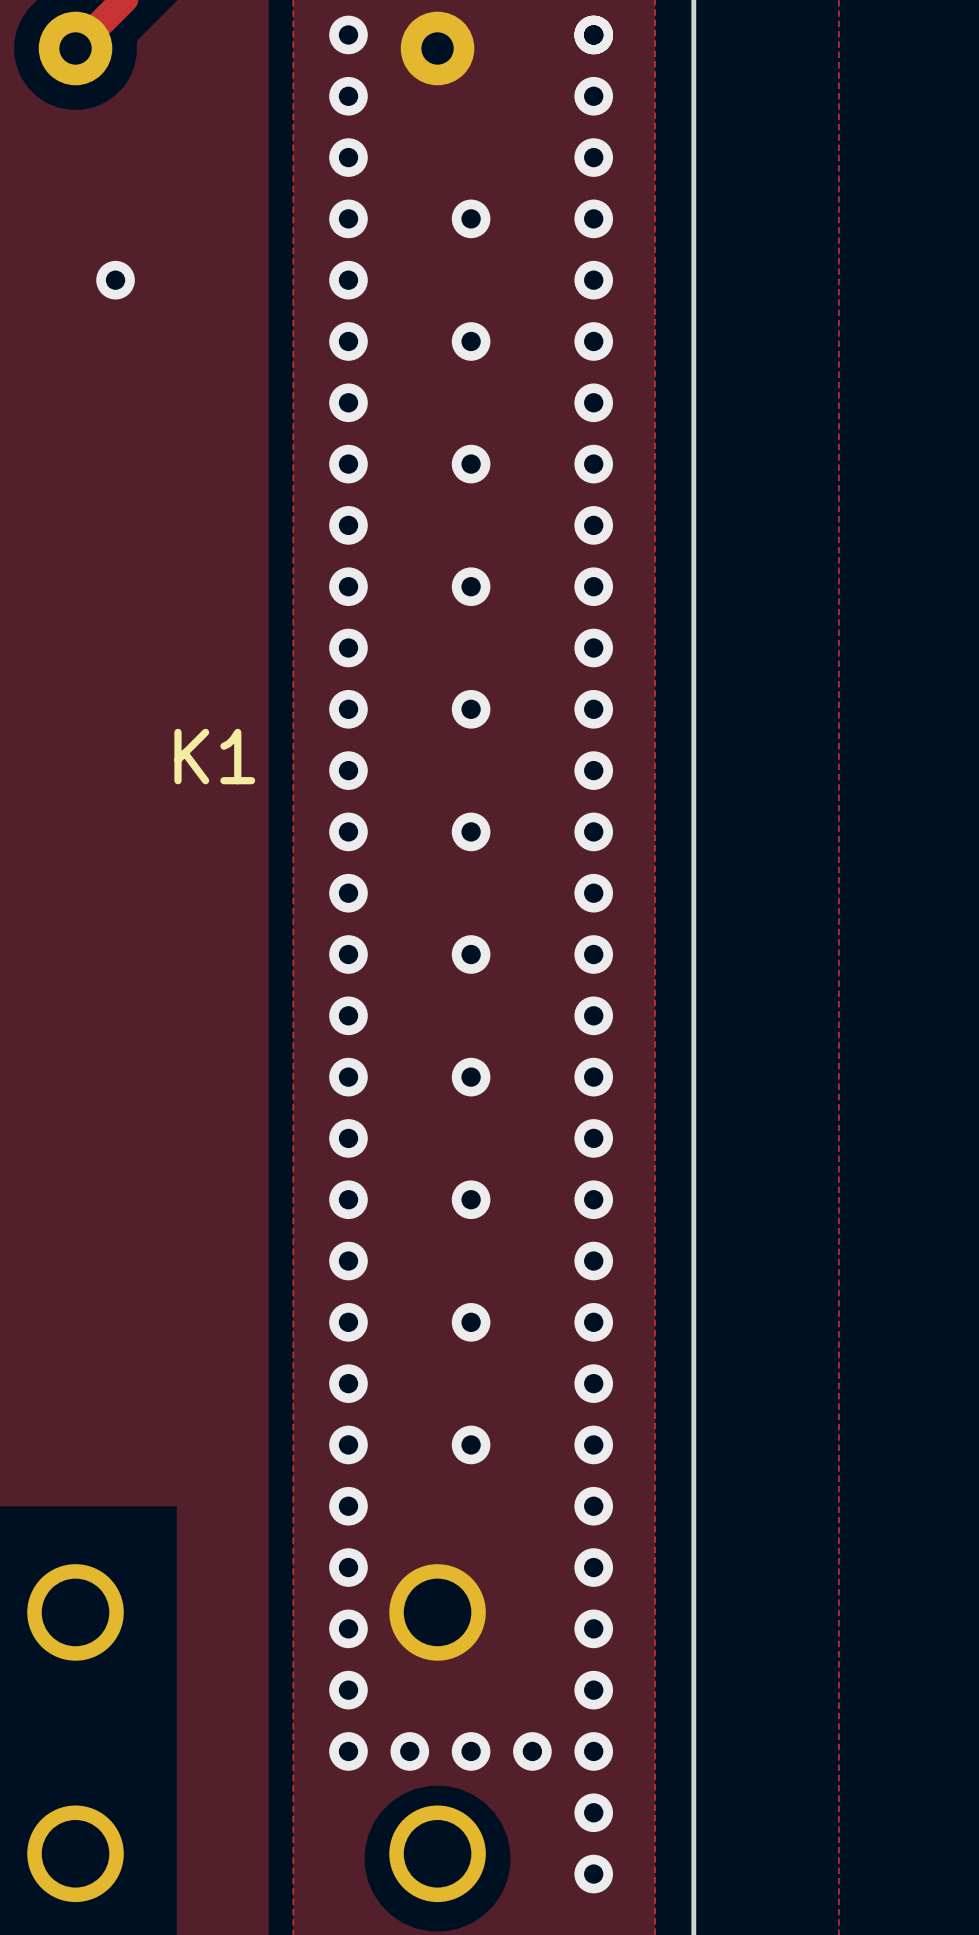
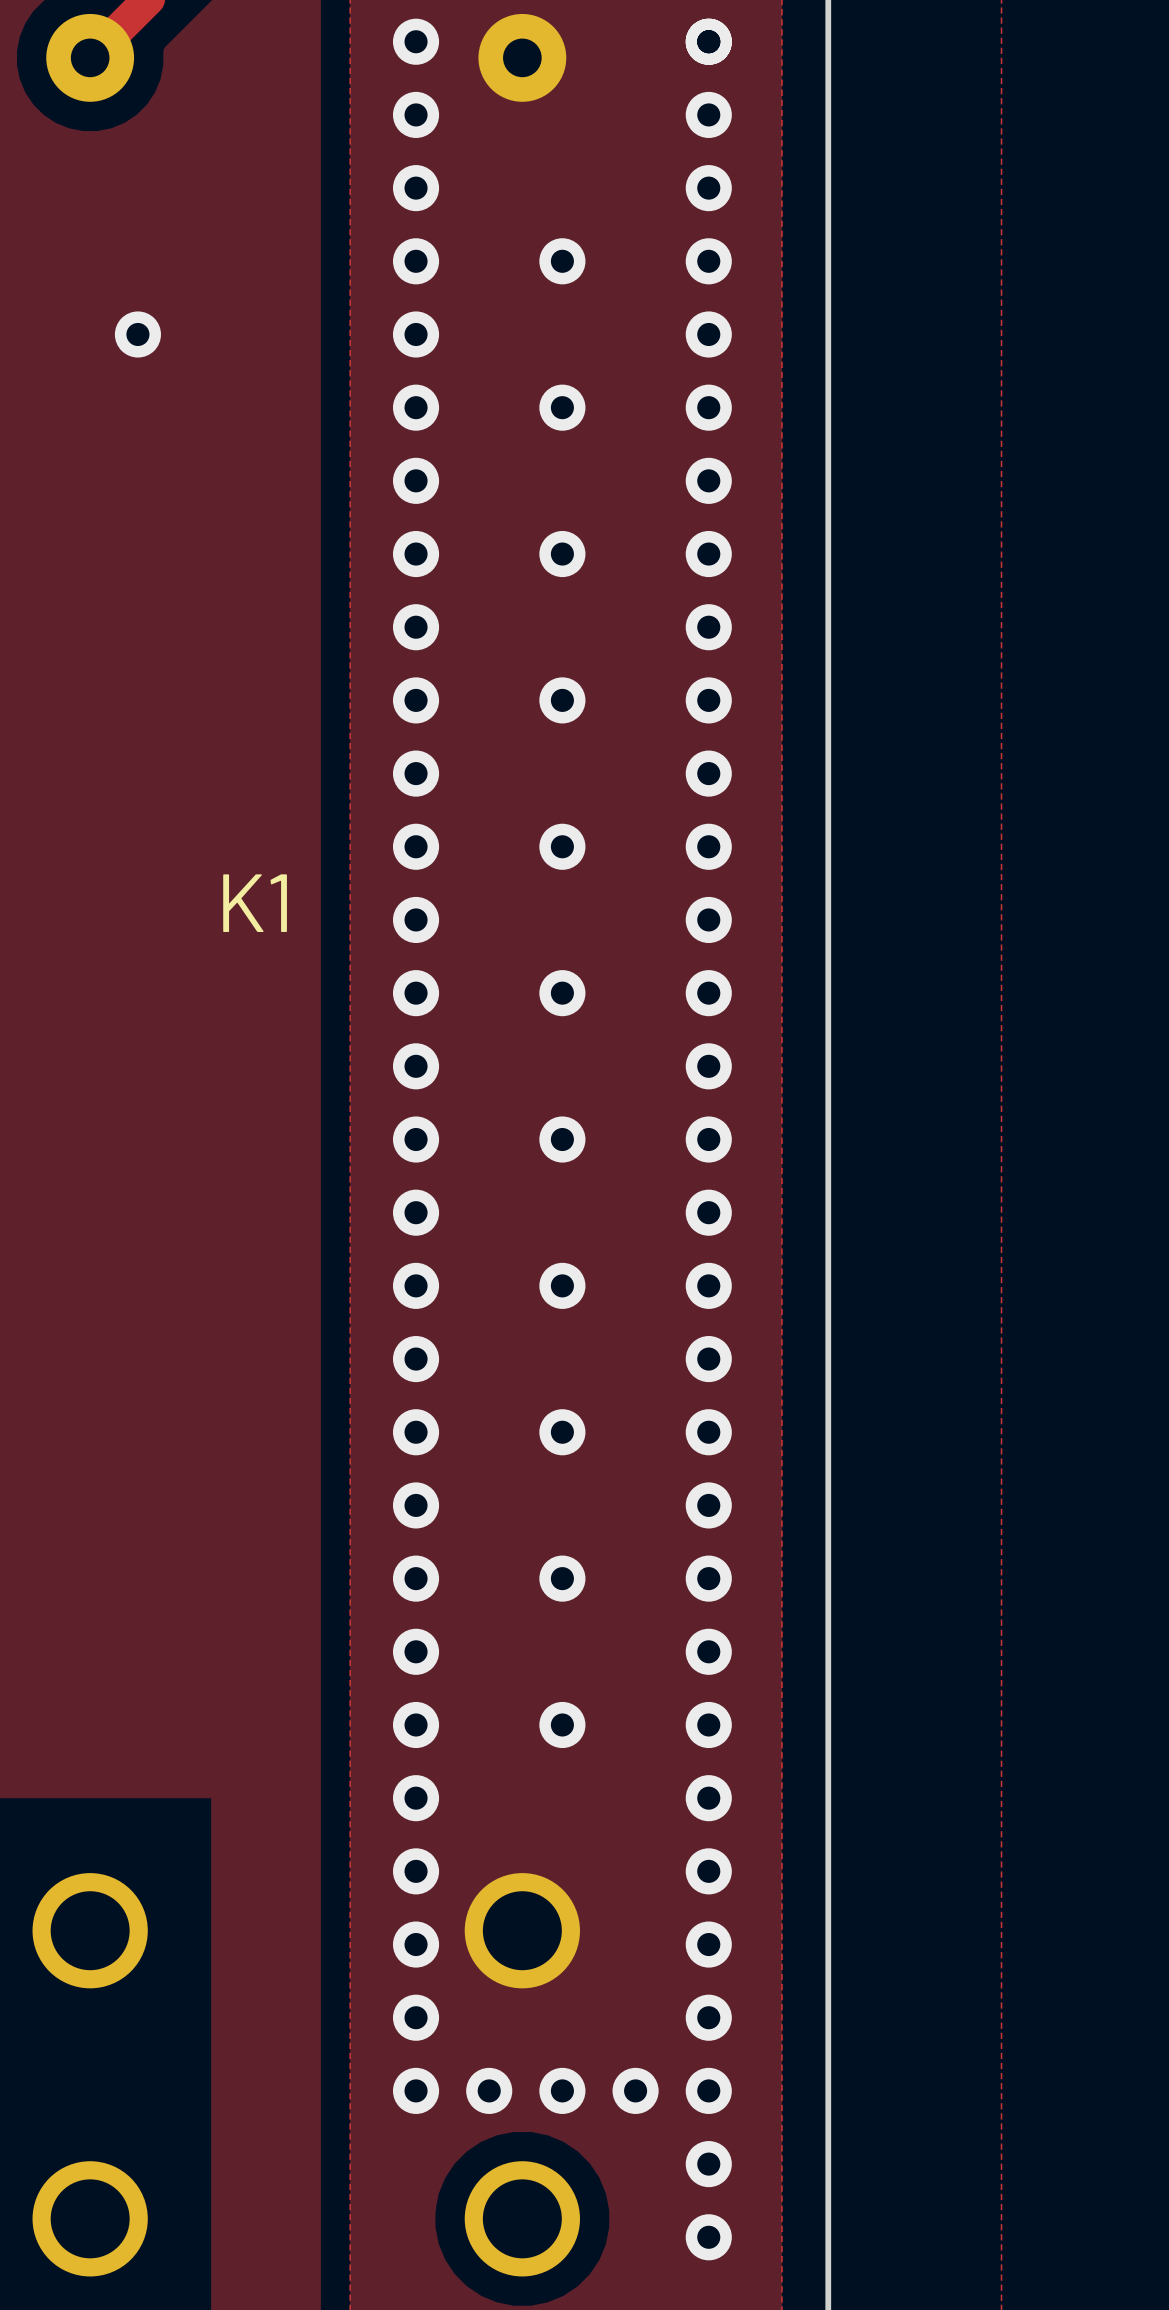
K1 footprint: [27, 11, 486, 1903] -> [32, 13, 580, 2277]

